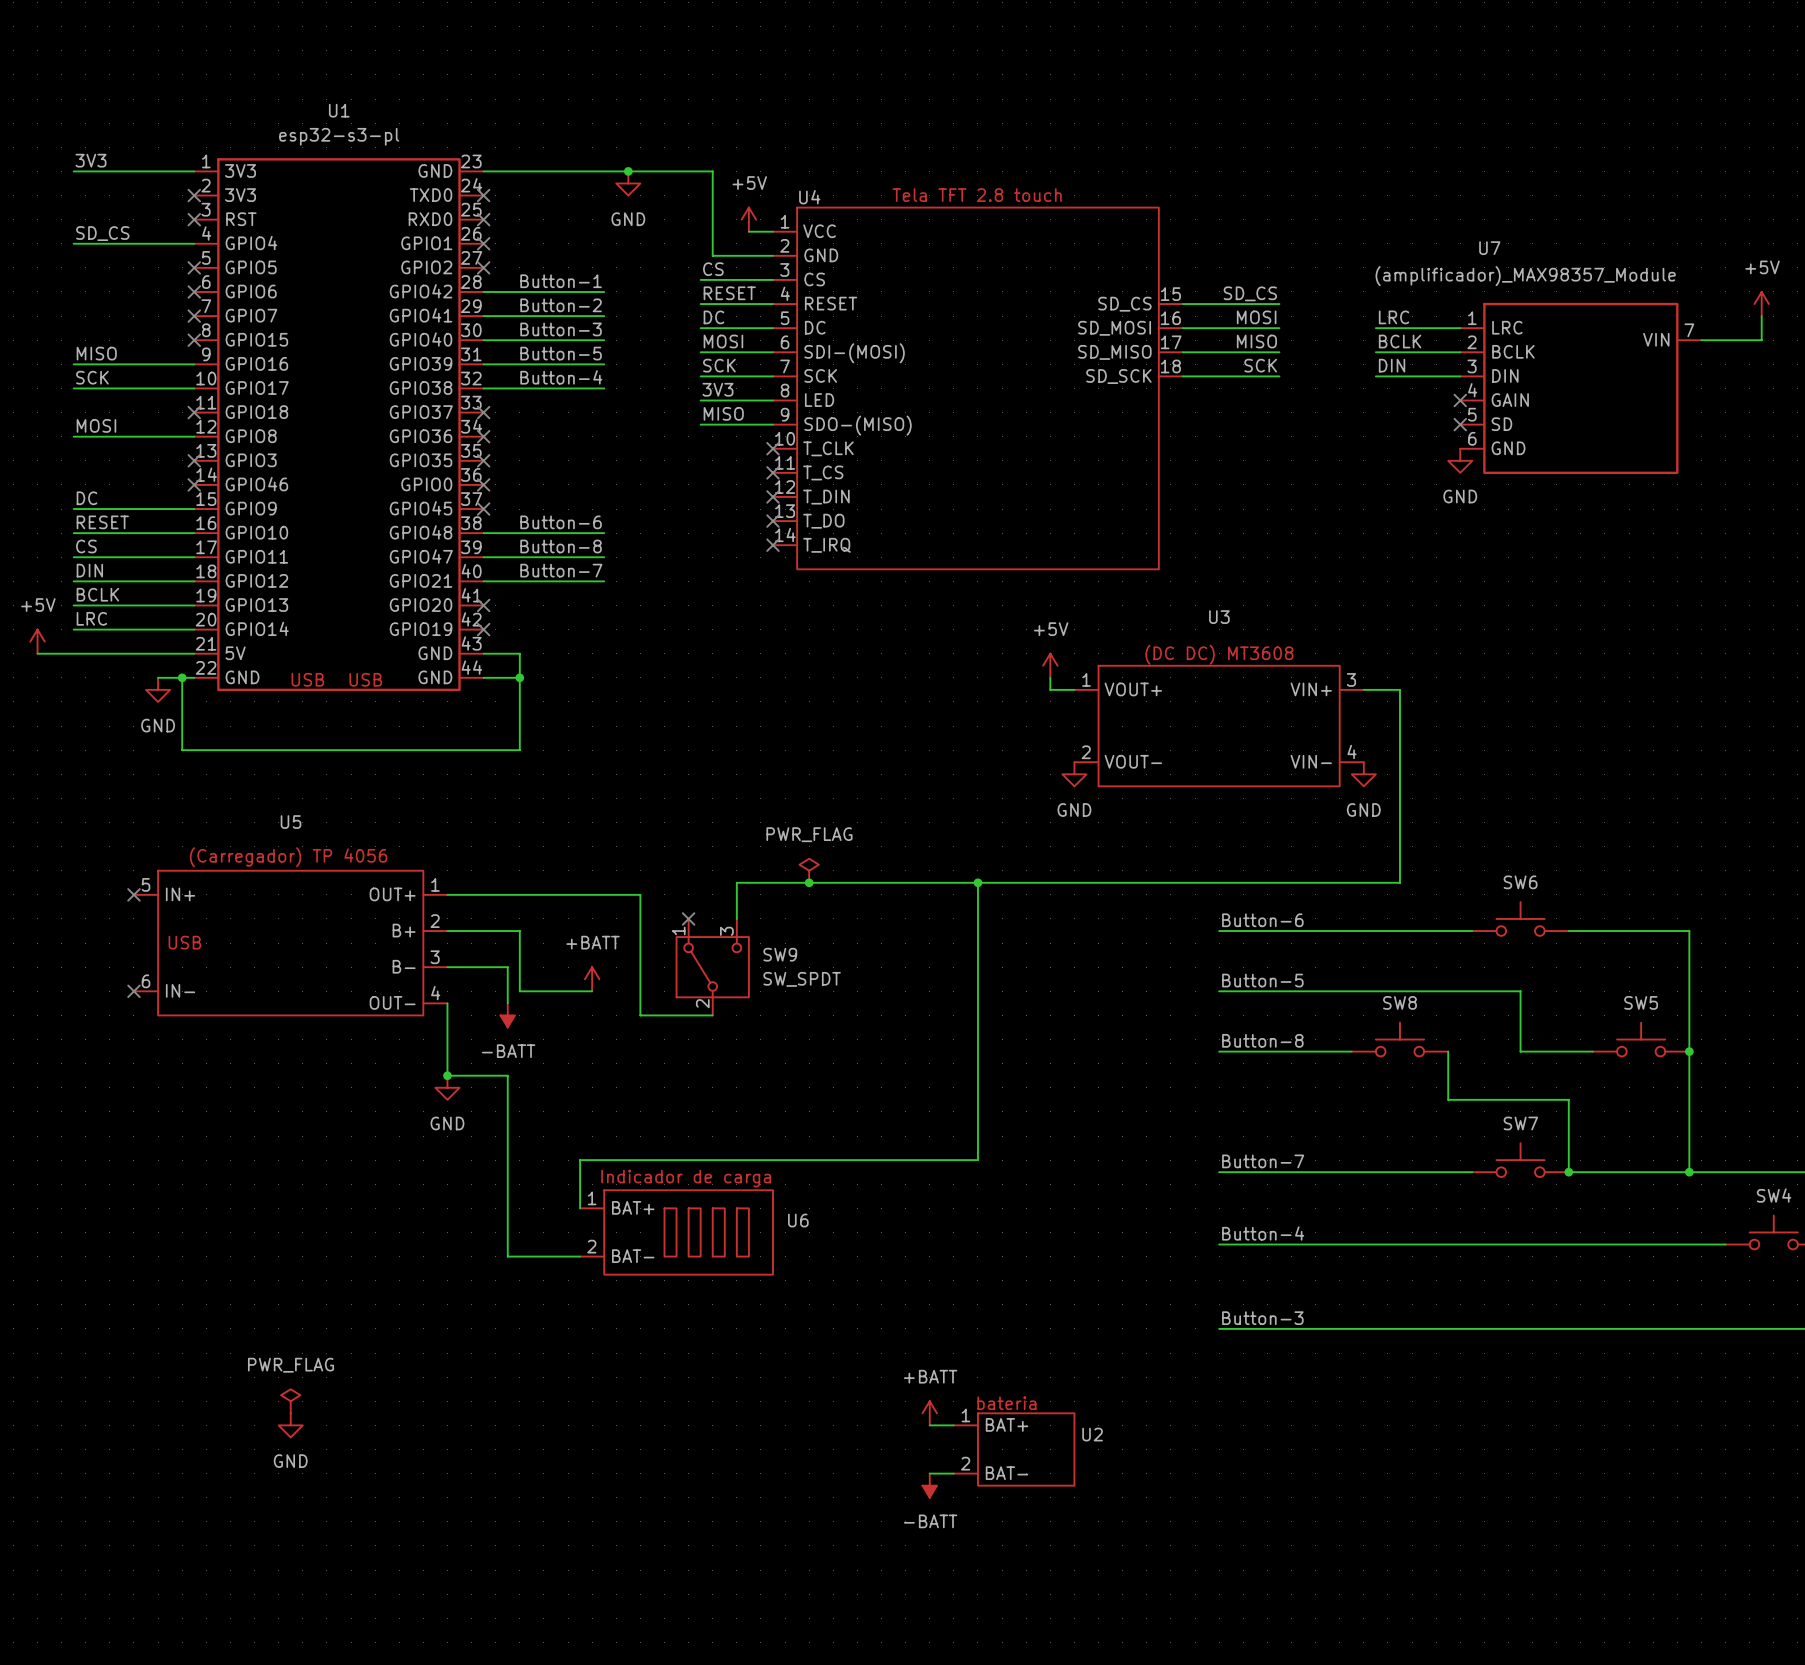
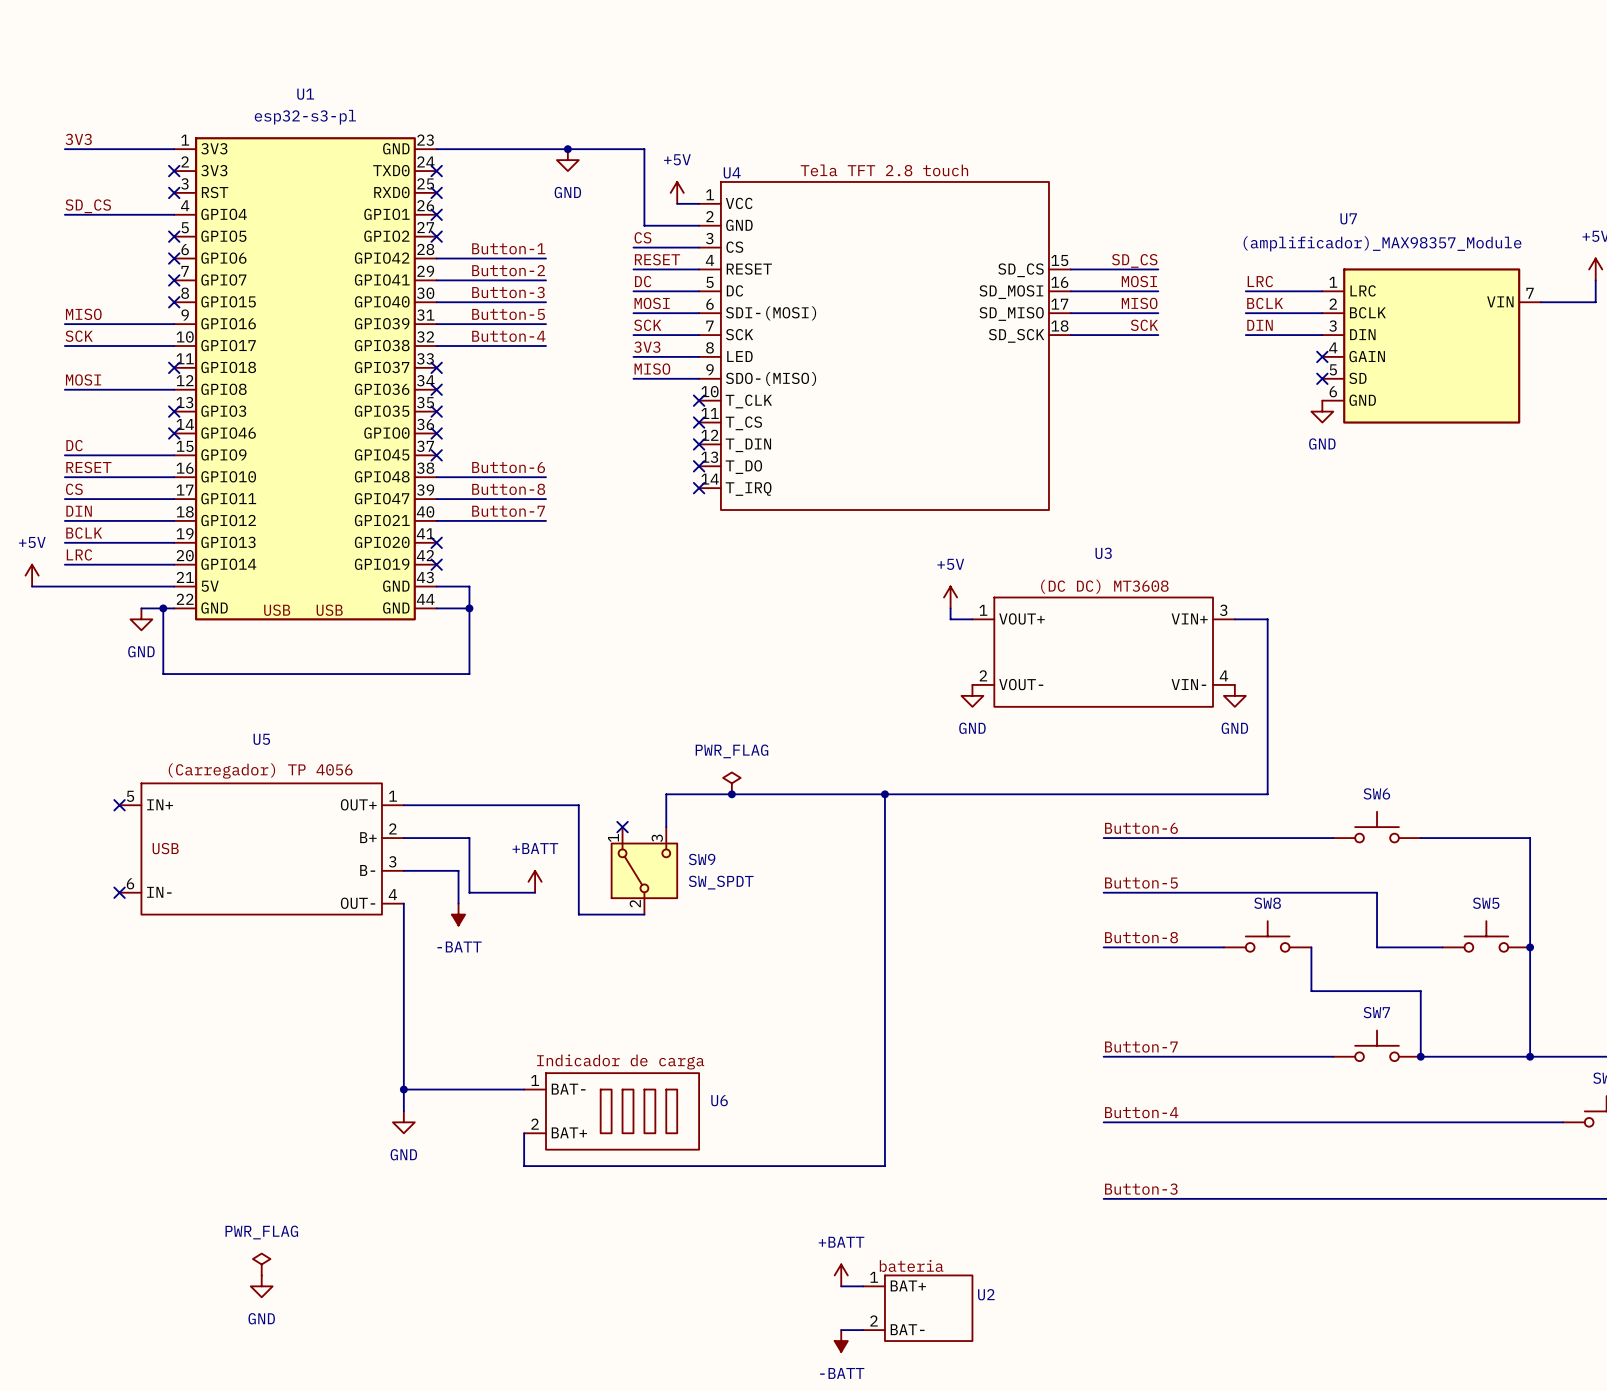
wire: (447, 1075) (507, 1075) (507, 1256) (580, 1256) -> (403, 969) (403, 1111)
junction: (447, 1075) -> none
power symbol position: GND (447, 1087) -> GND (403, 1122)
wire: (977, 1160) (580, 1160) (580, 1208) -> (884, 1045) (884, 1166) (524, 1166) (524, 1133)
U6 pin name: BAT+ (633, 1207) -> BAT- (568, 1089)
wire: none -> (403, 1089) (524, 1089)
junction: none -> (403, 1089)
U6 pin name: BAT- (633, 1256) -> BAT+ (569, 1132)

